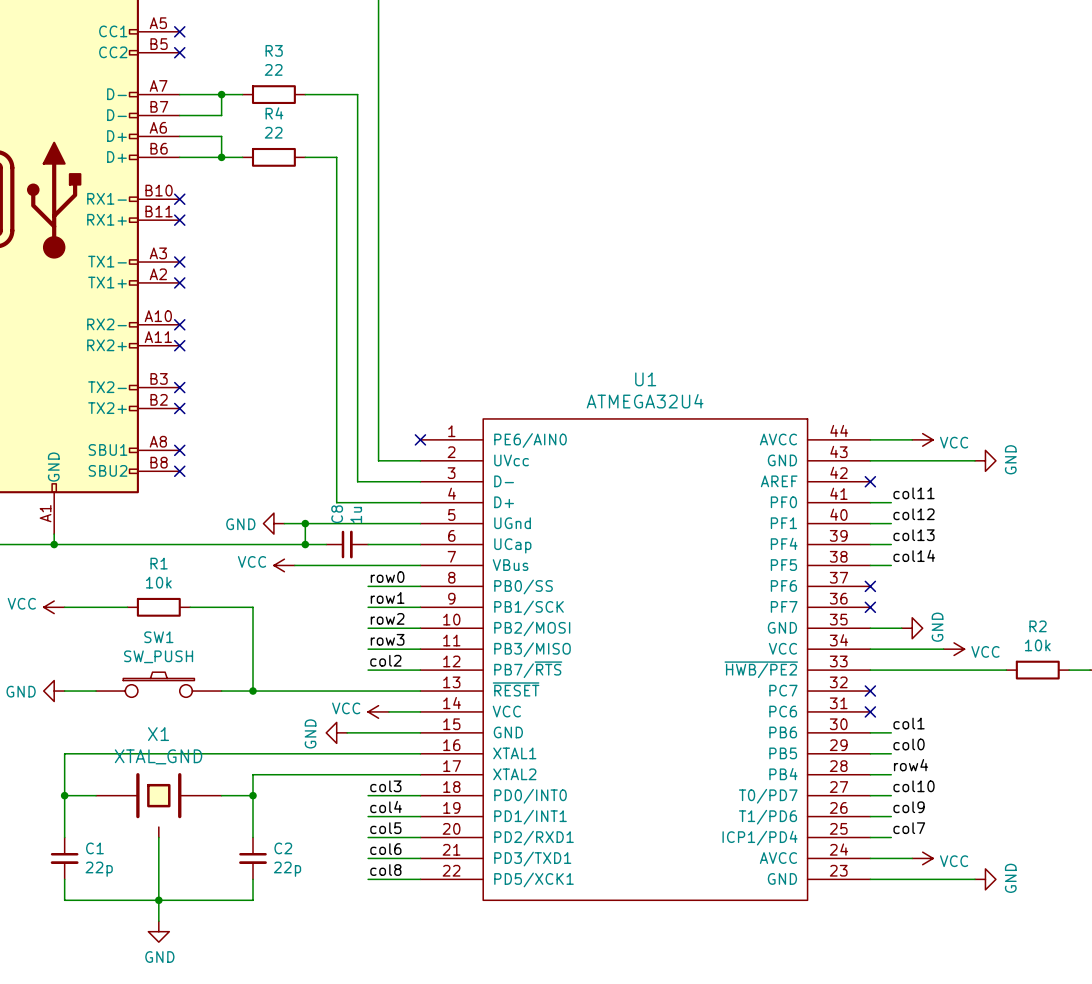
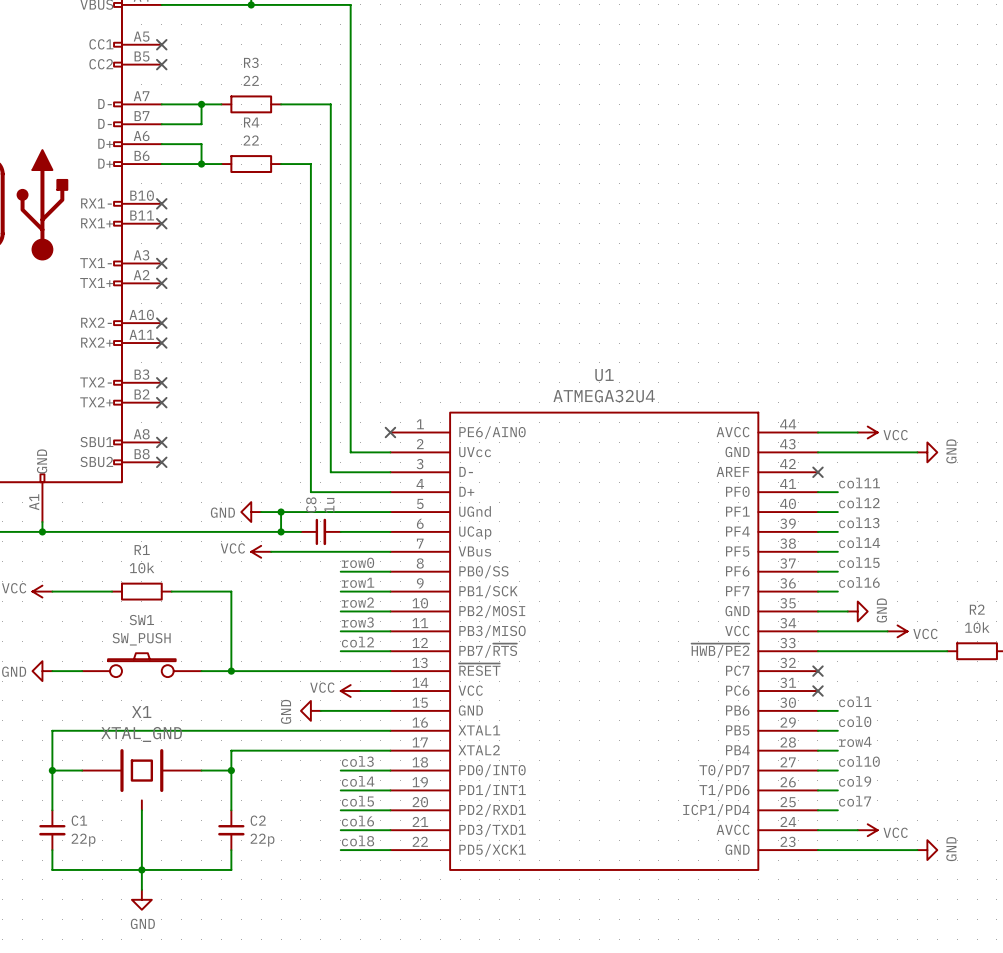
label: none -> col15 (859, 562)
wire: none -> (817, 571) (837, 571)
no-connect mark: (870, 586) -> none
label: none -> col16 (859, 582)
wire: none -> (817, 591) (837, 591)
no-connect mark: (870, 607) -> none

